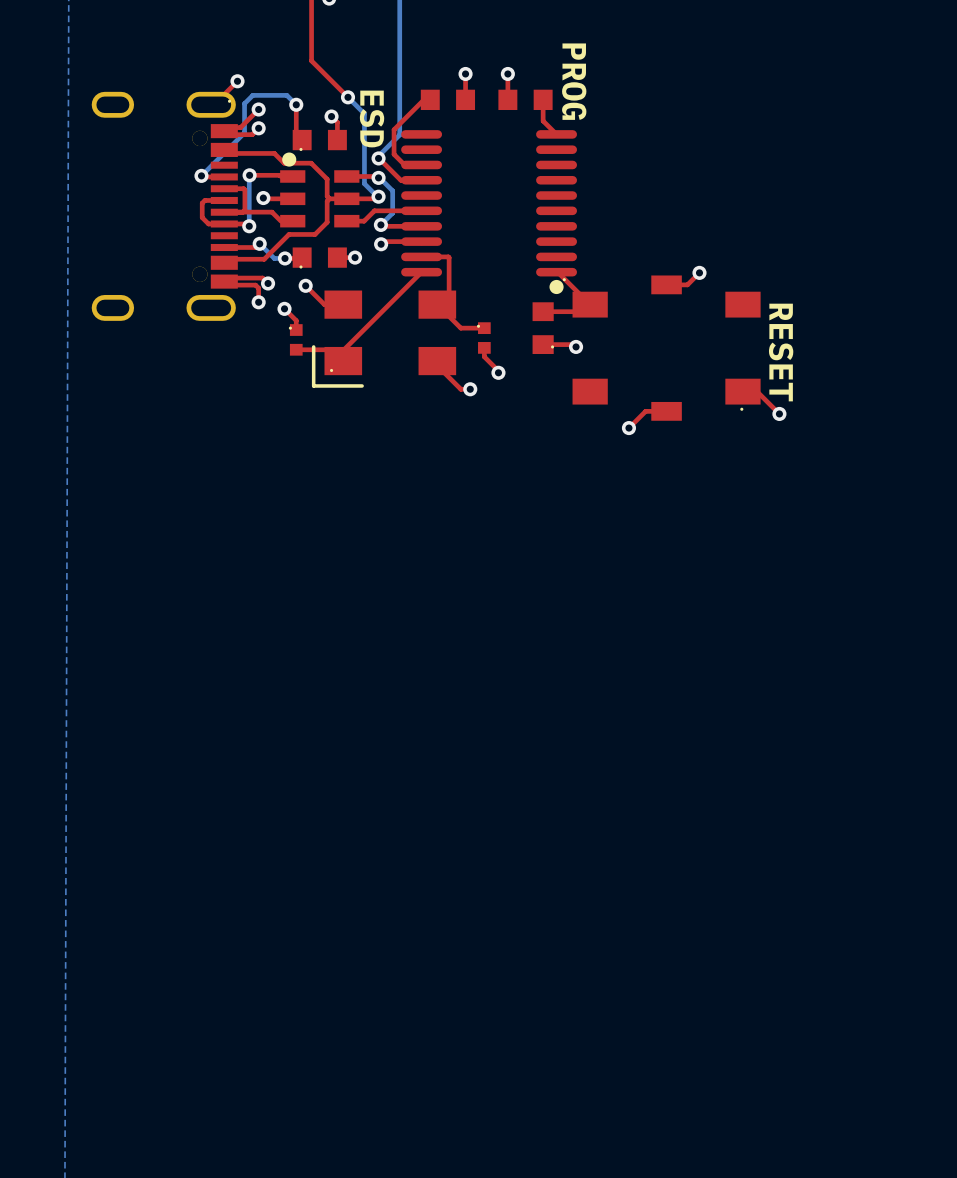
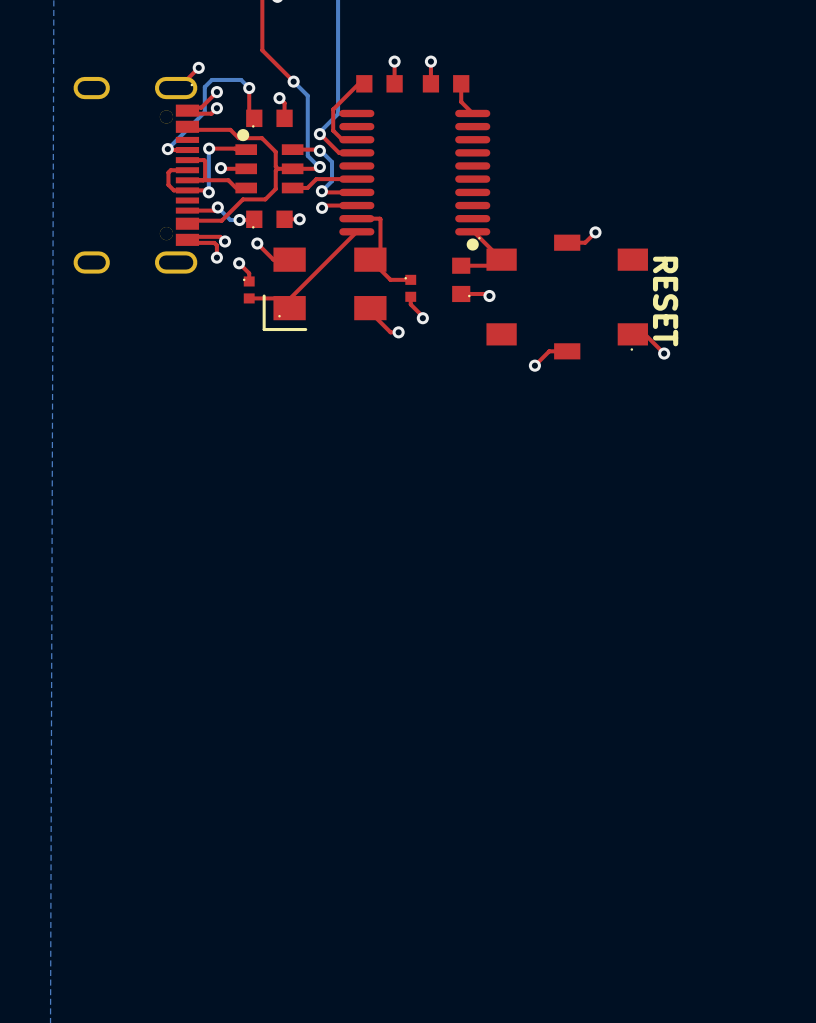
text: PROG (574, 81) -> none
text: ESD (372, 119) -> none

